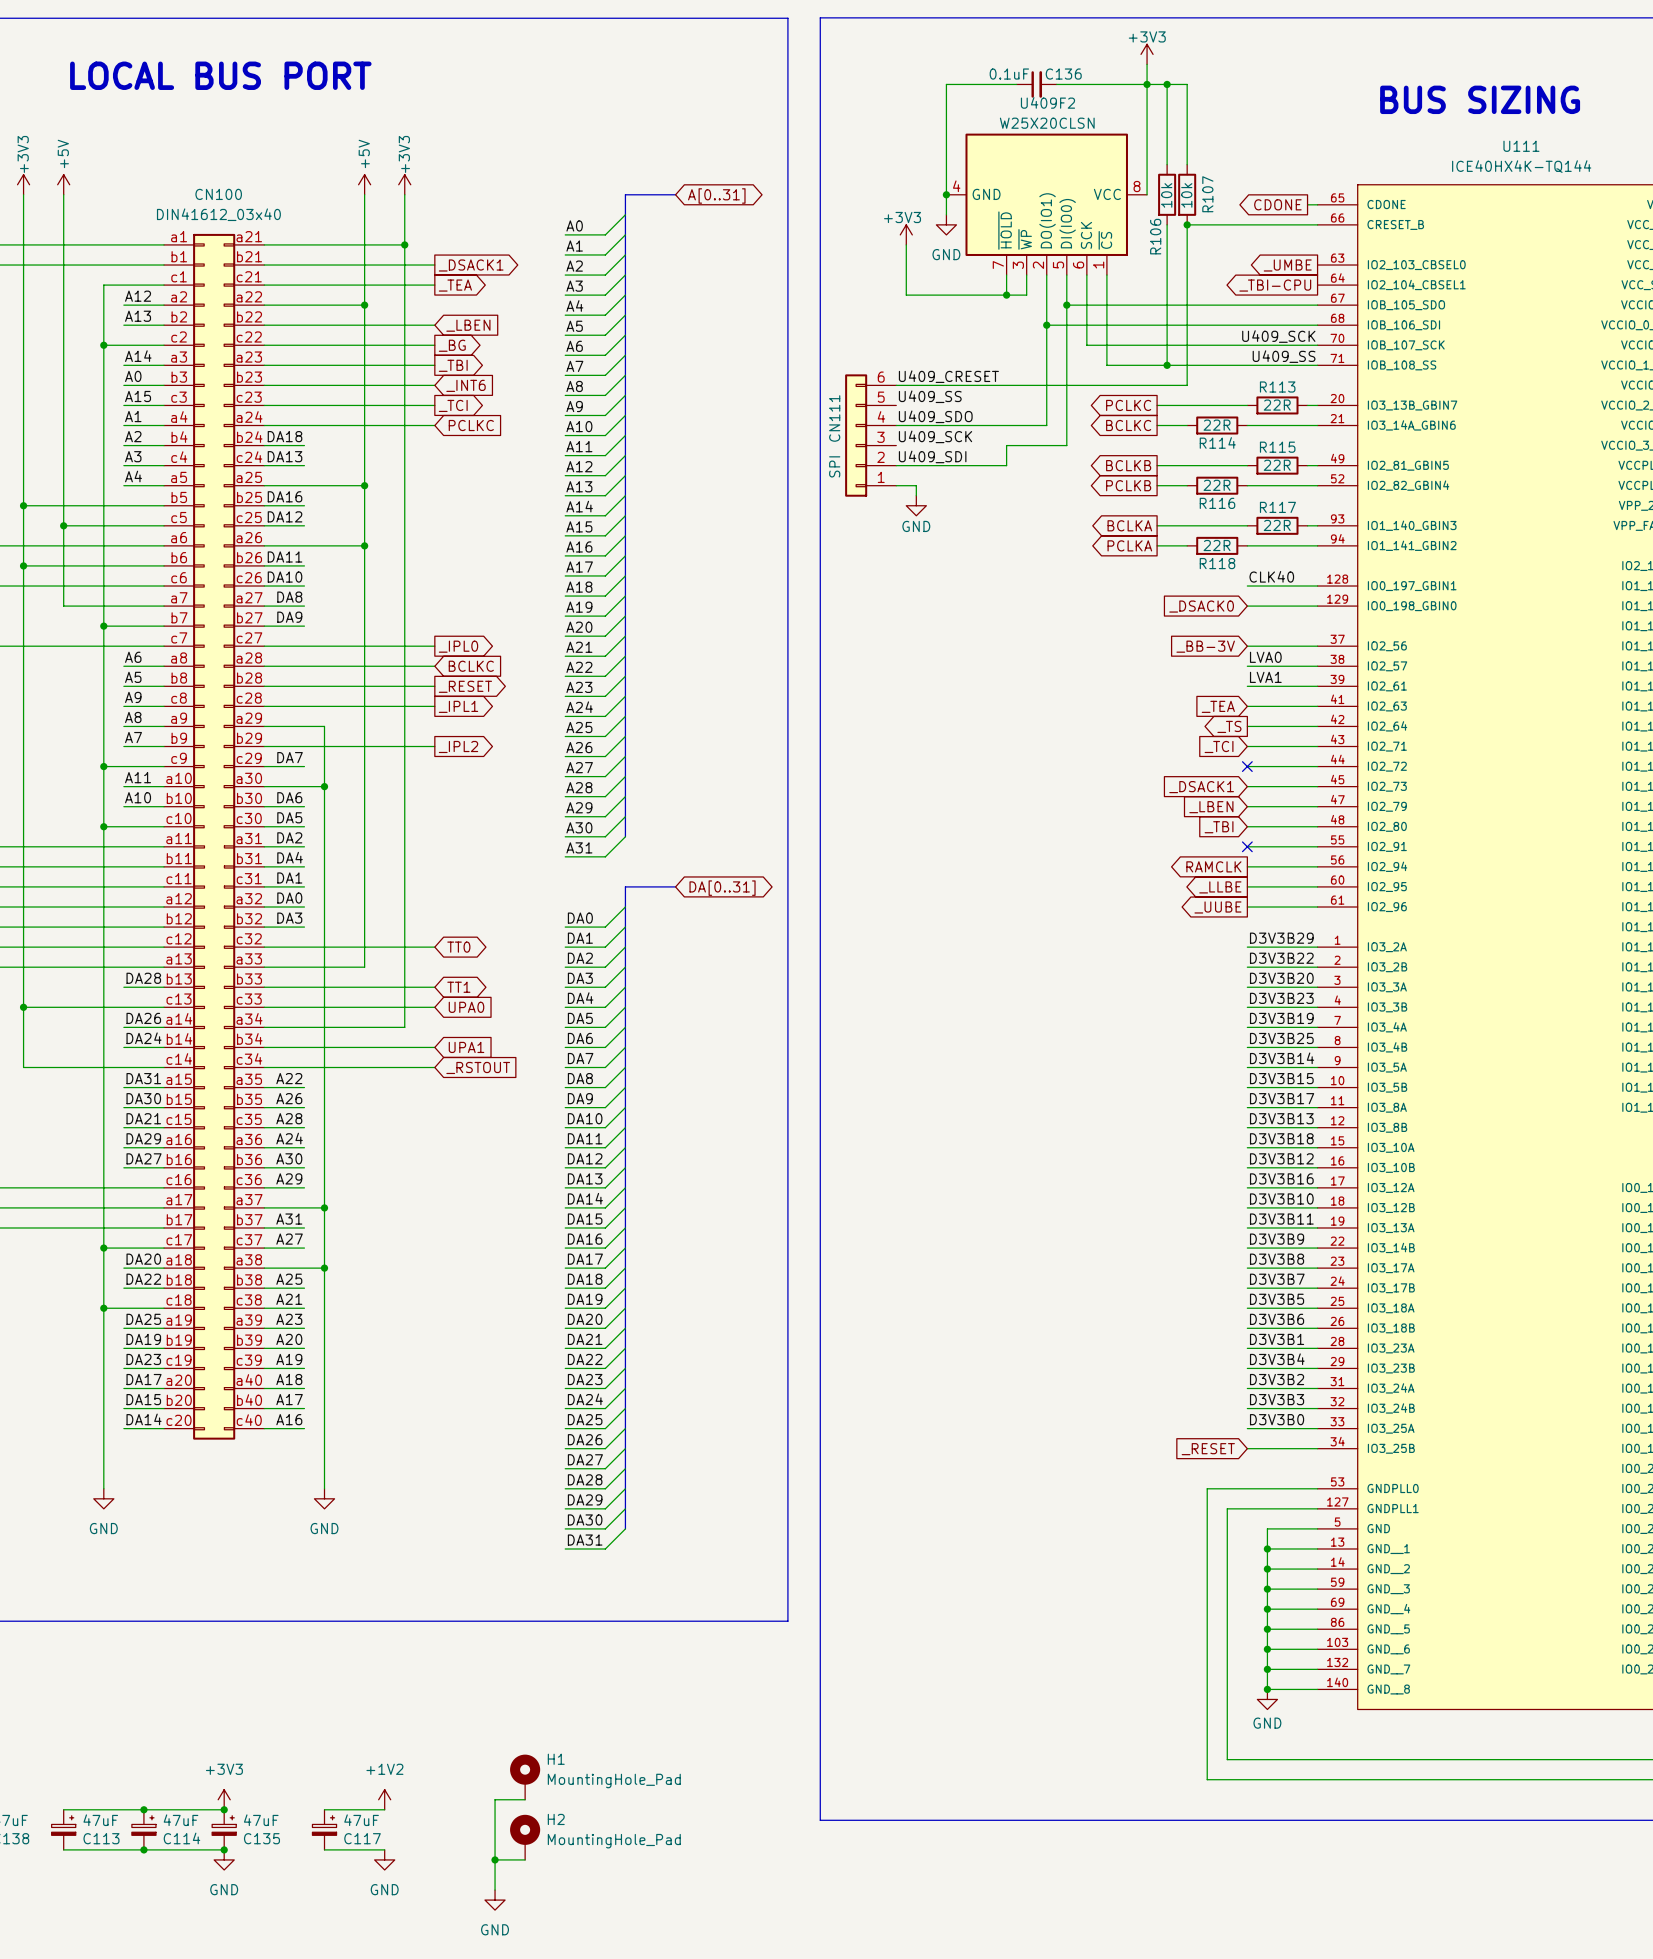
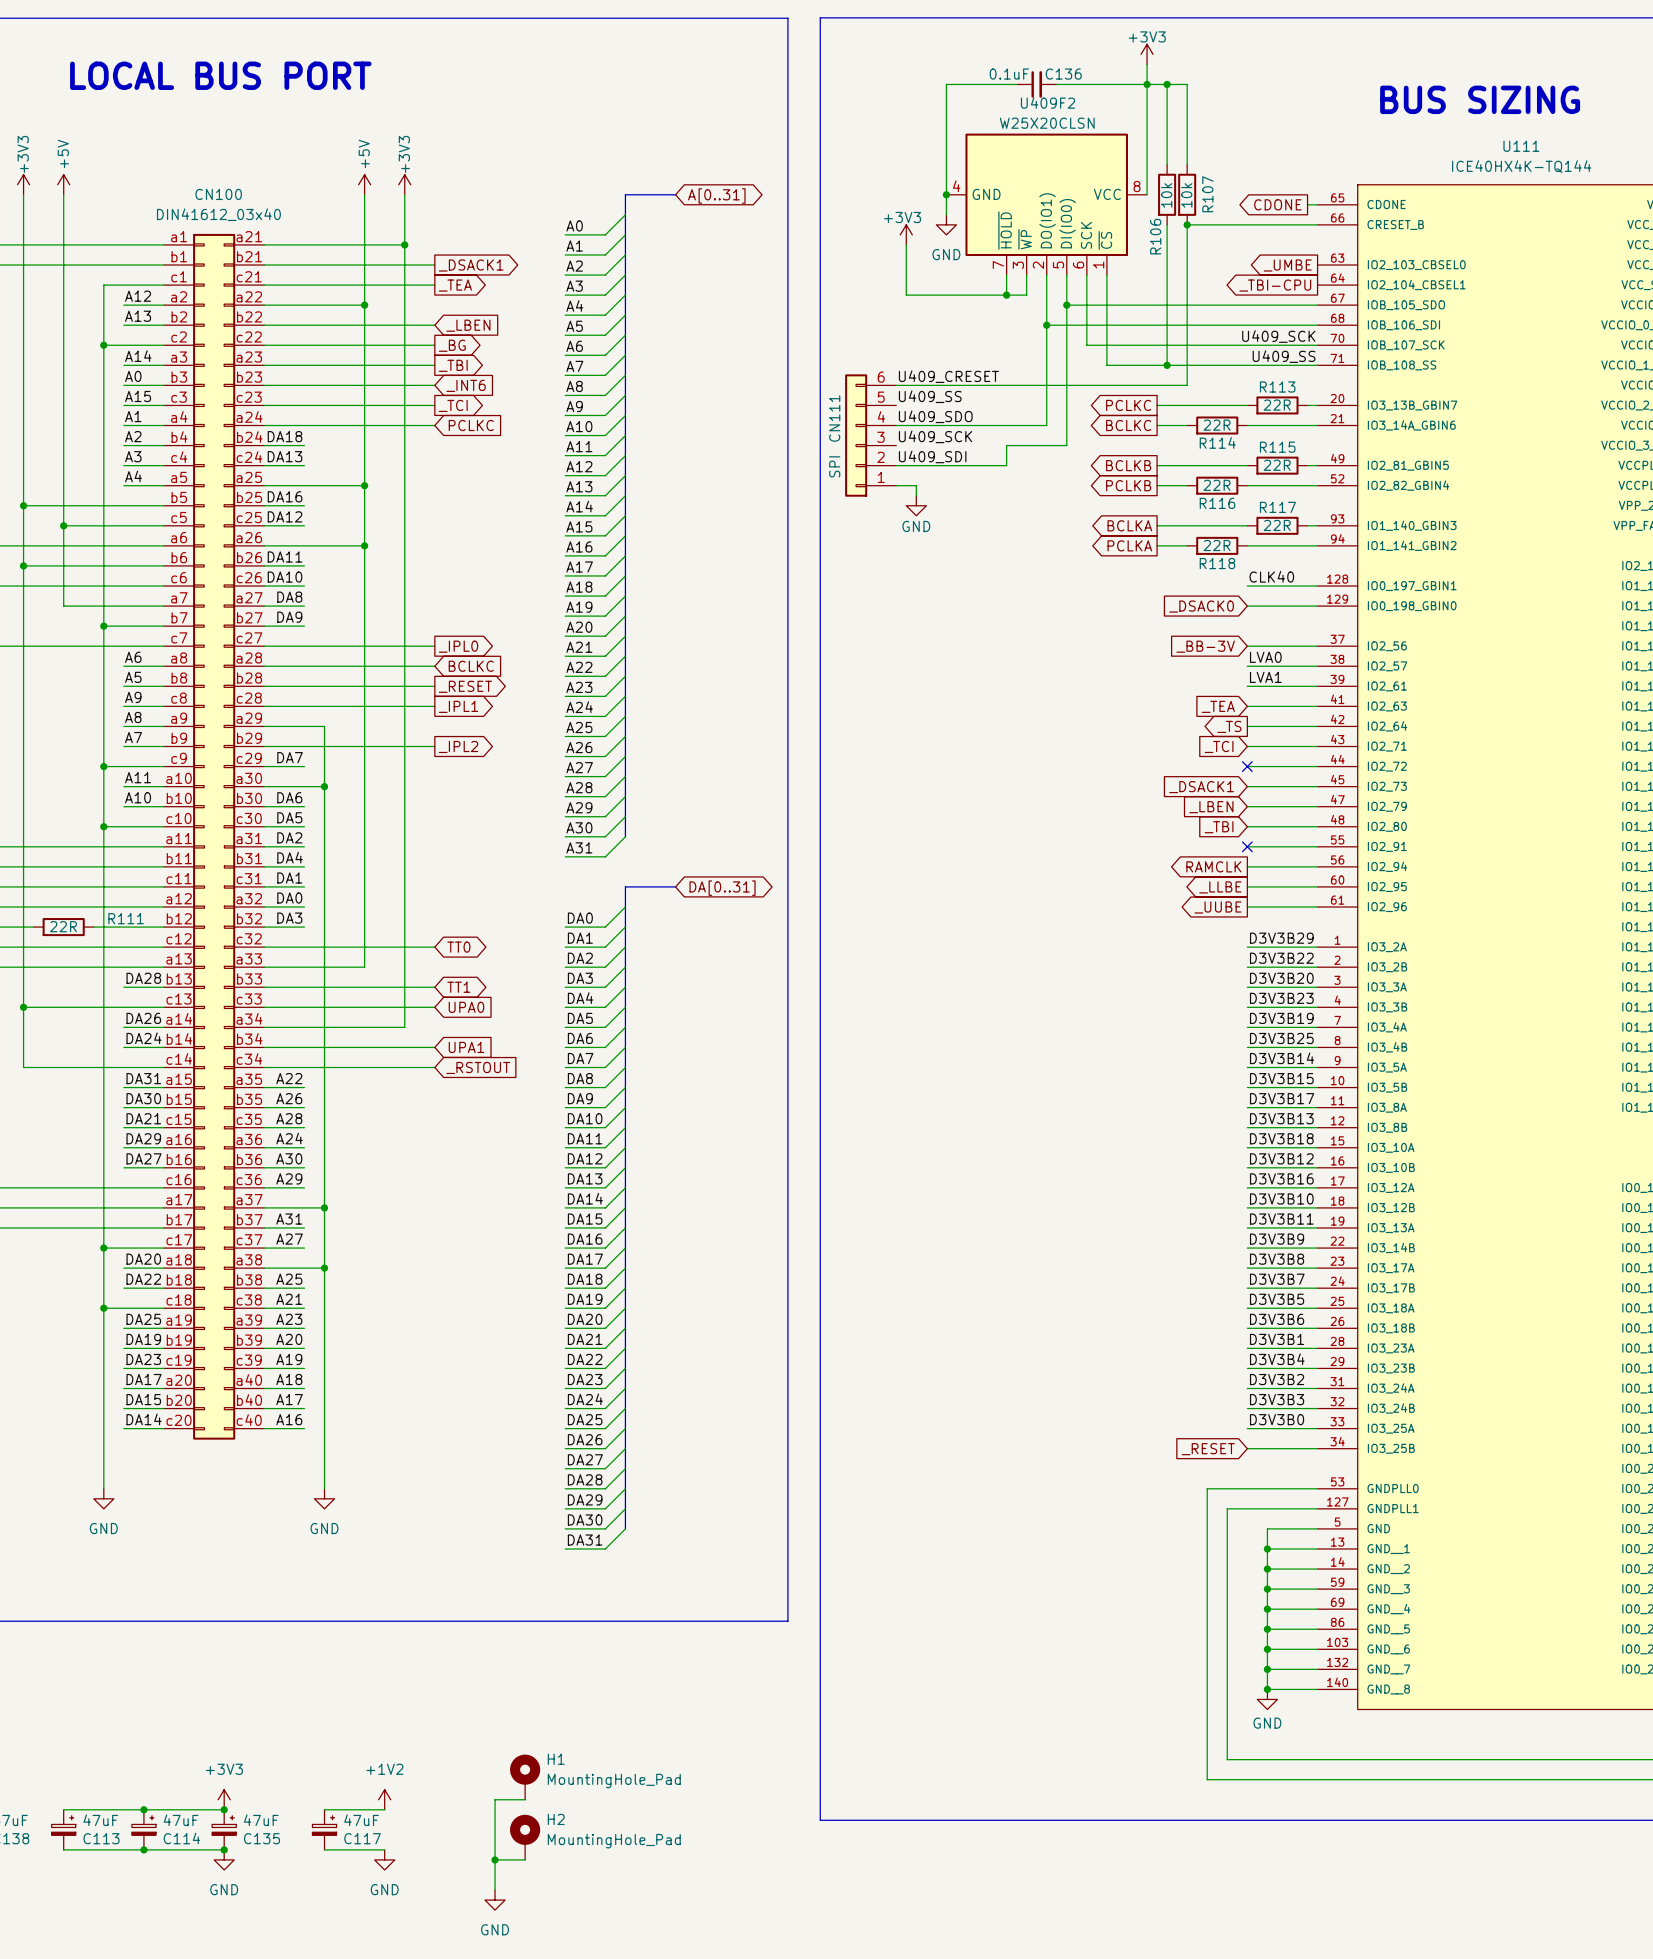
wire: (33, 927) (93, 927) -> none
R111: none -> 22R (63, 927)

